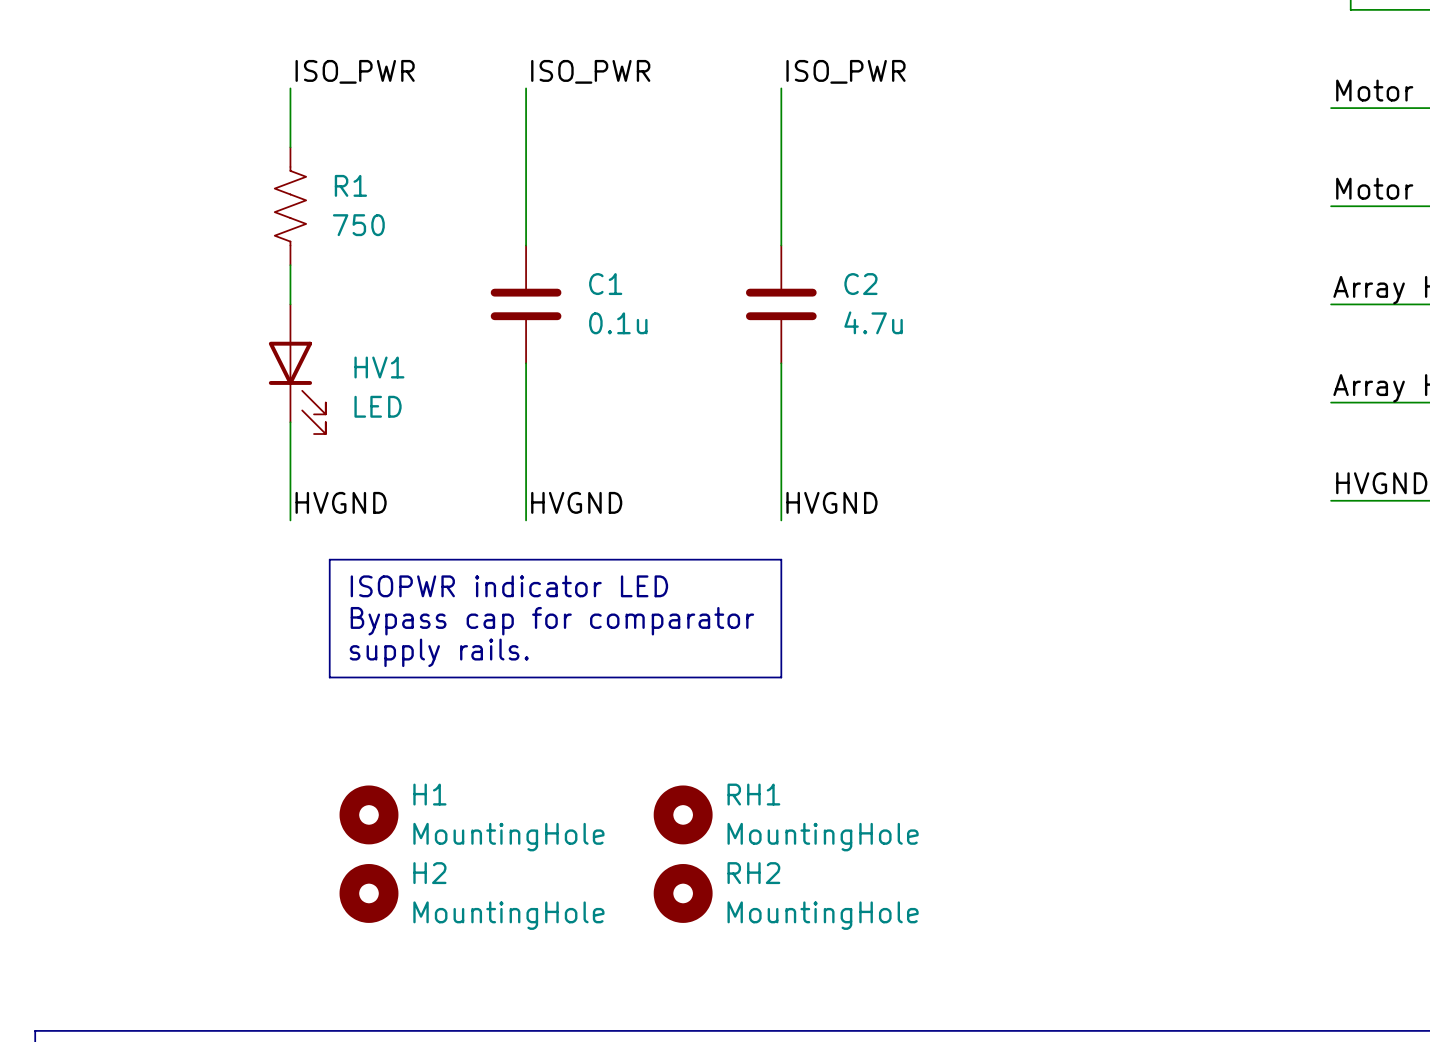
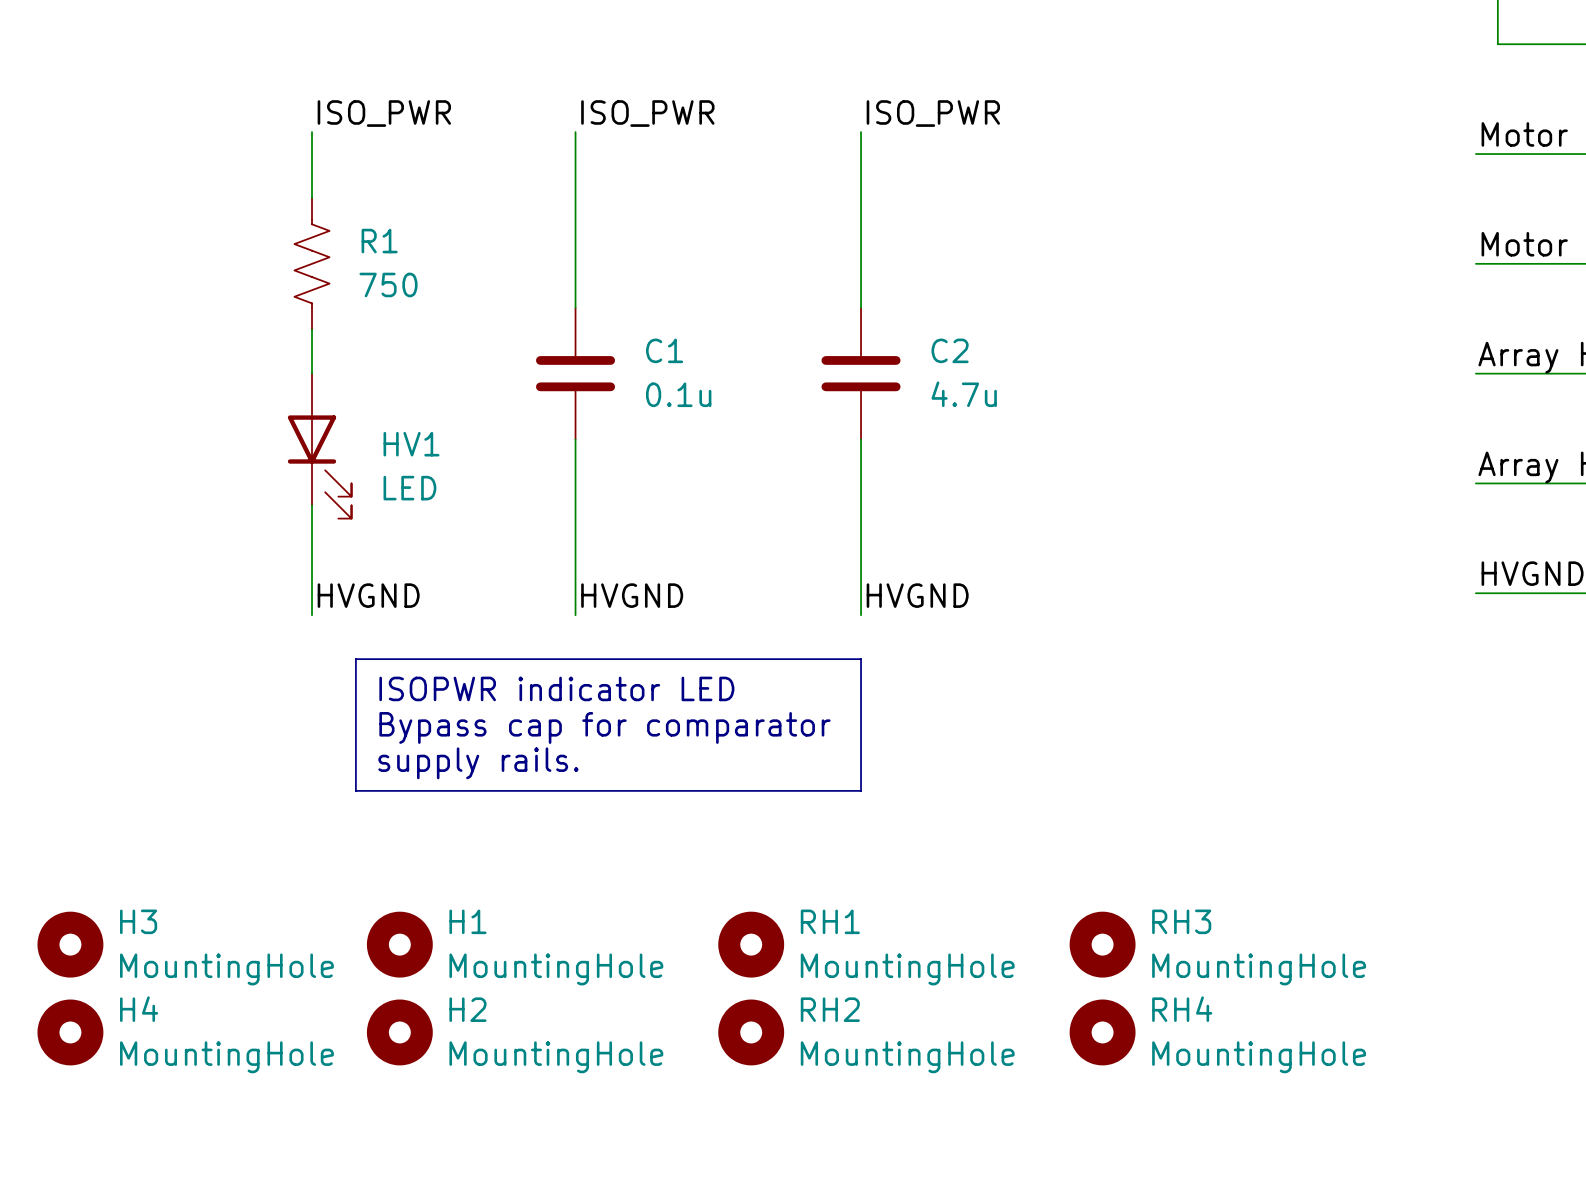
H3: none -> MountingHole (70, 944)
RH3: none -> MountingHole (1102, 944)
H4: none -> MountingHole (70, 1032)
RH4: none -> MountingHole (1102, 1032)

